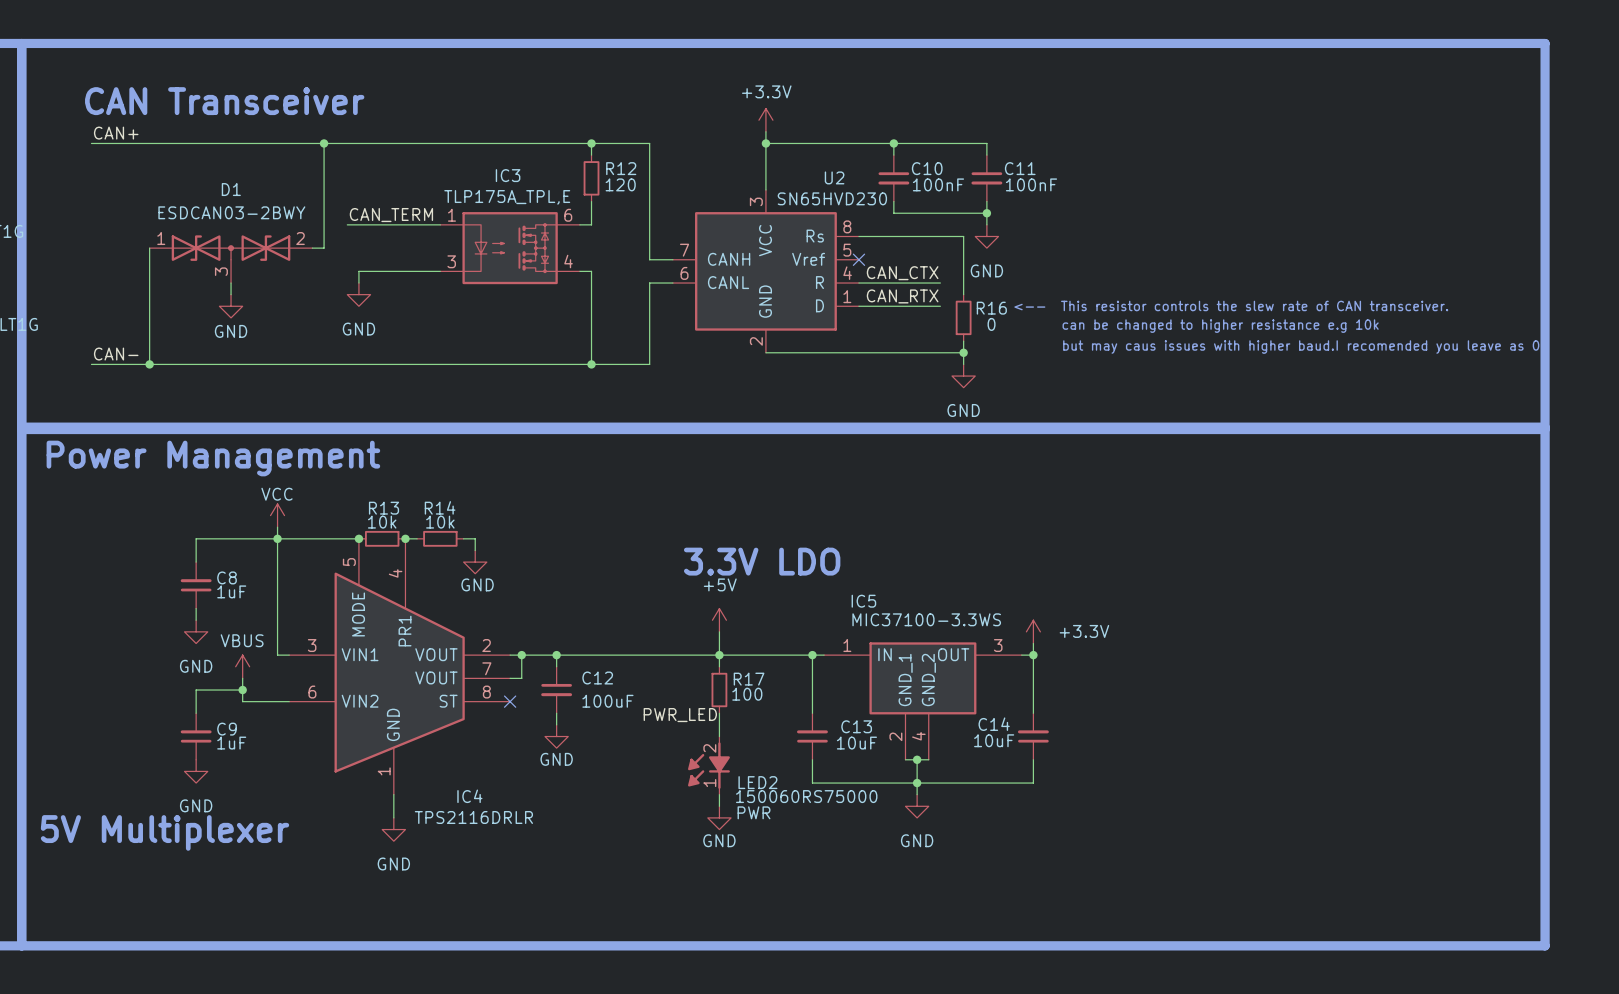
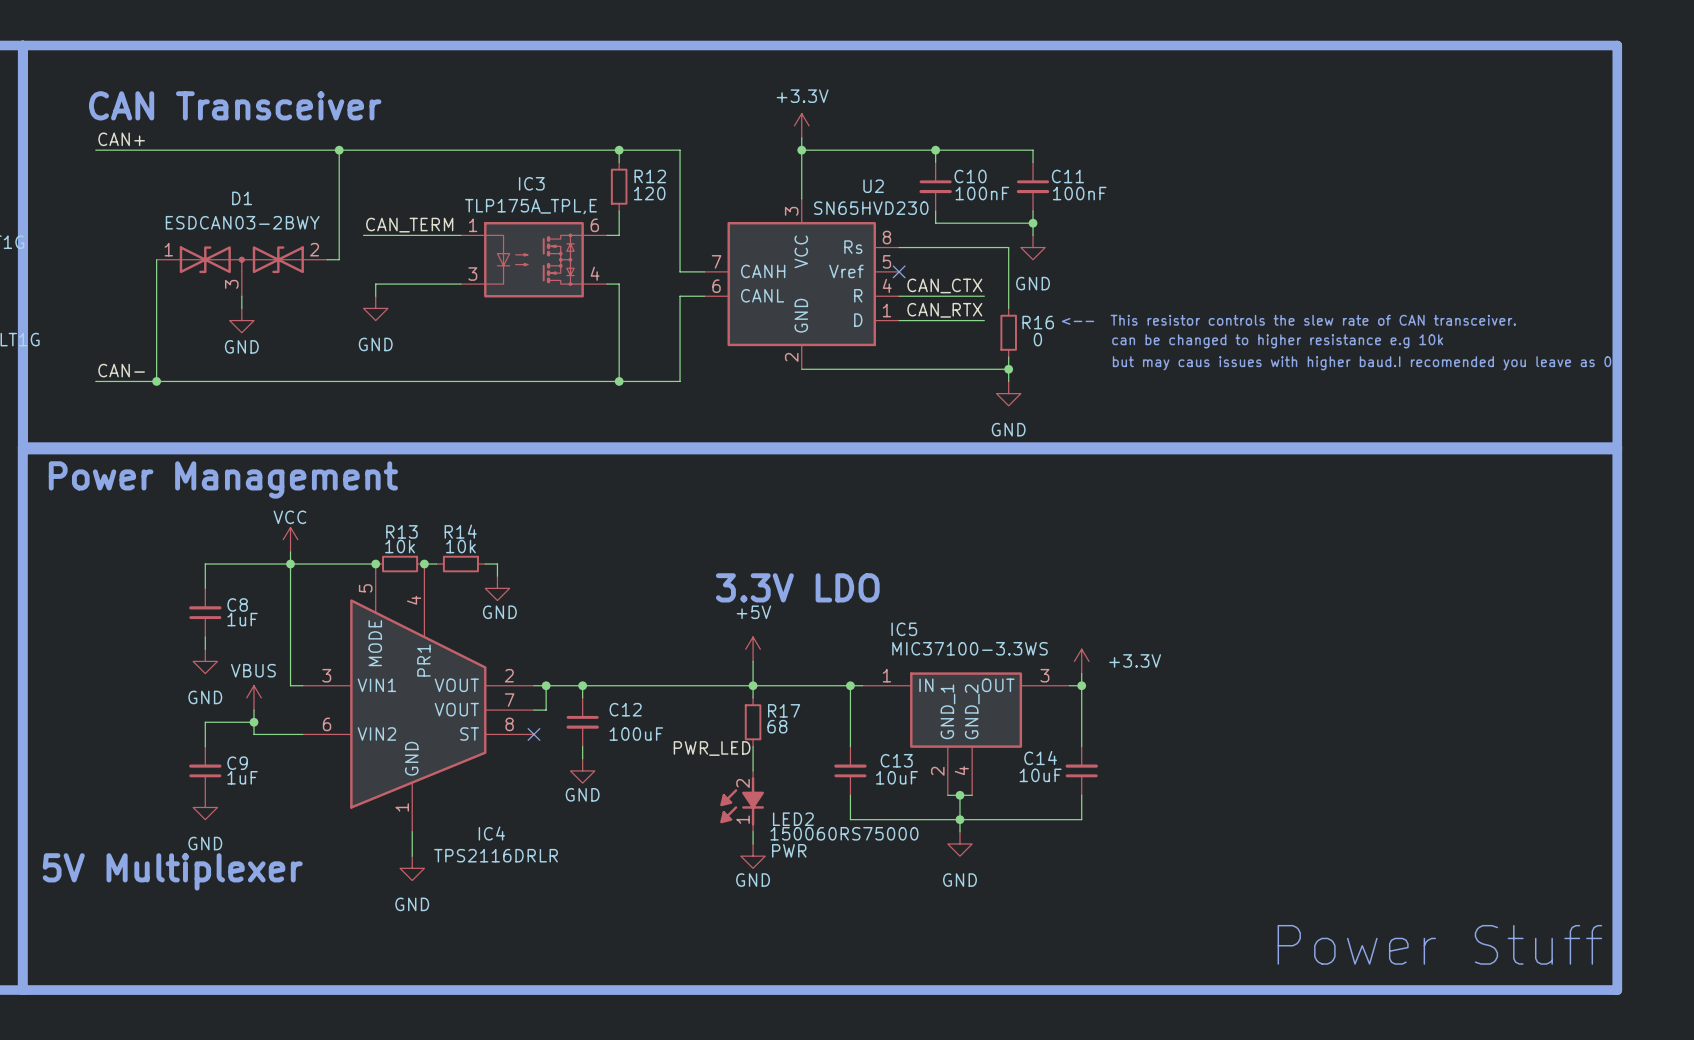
R17 value: 100 (747, 694) -> 68 (777, 726)
text: none -> Power Stuff (1439, 944)

